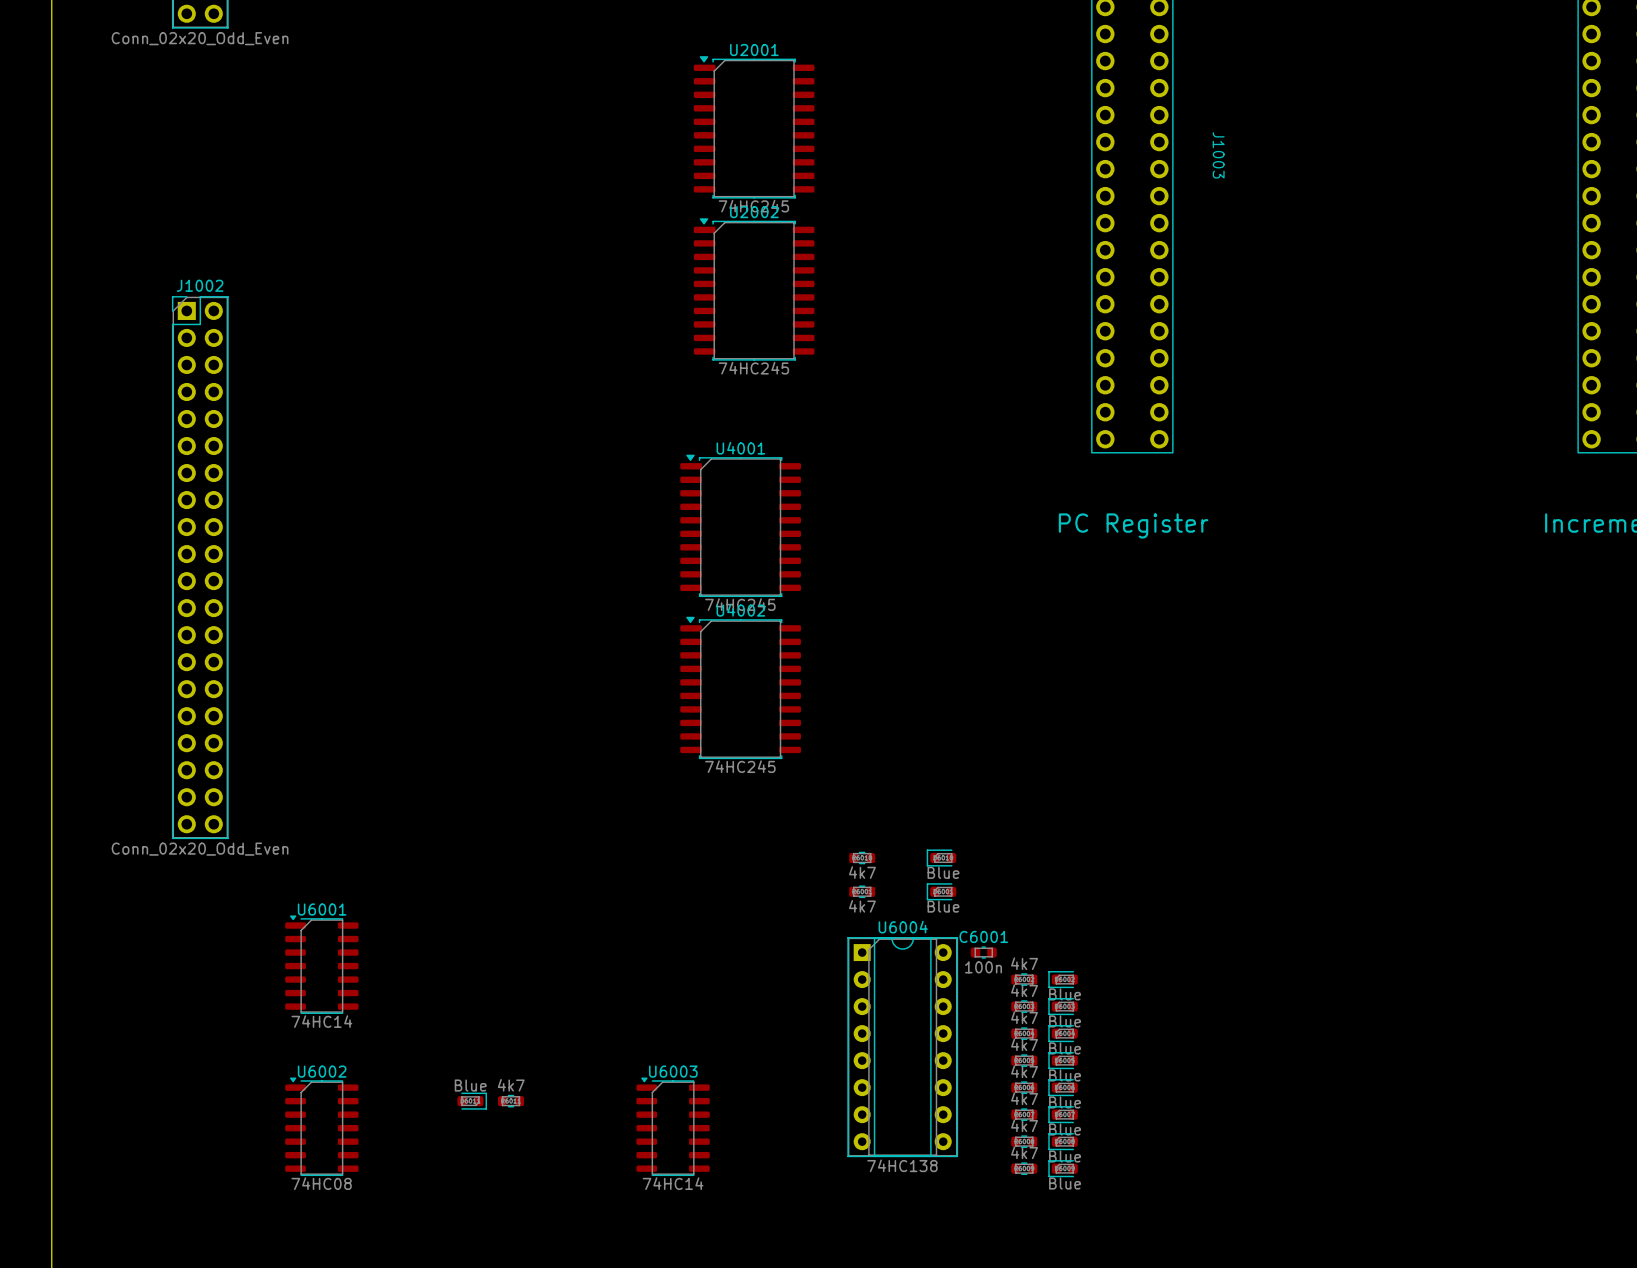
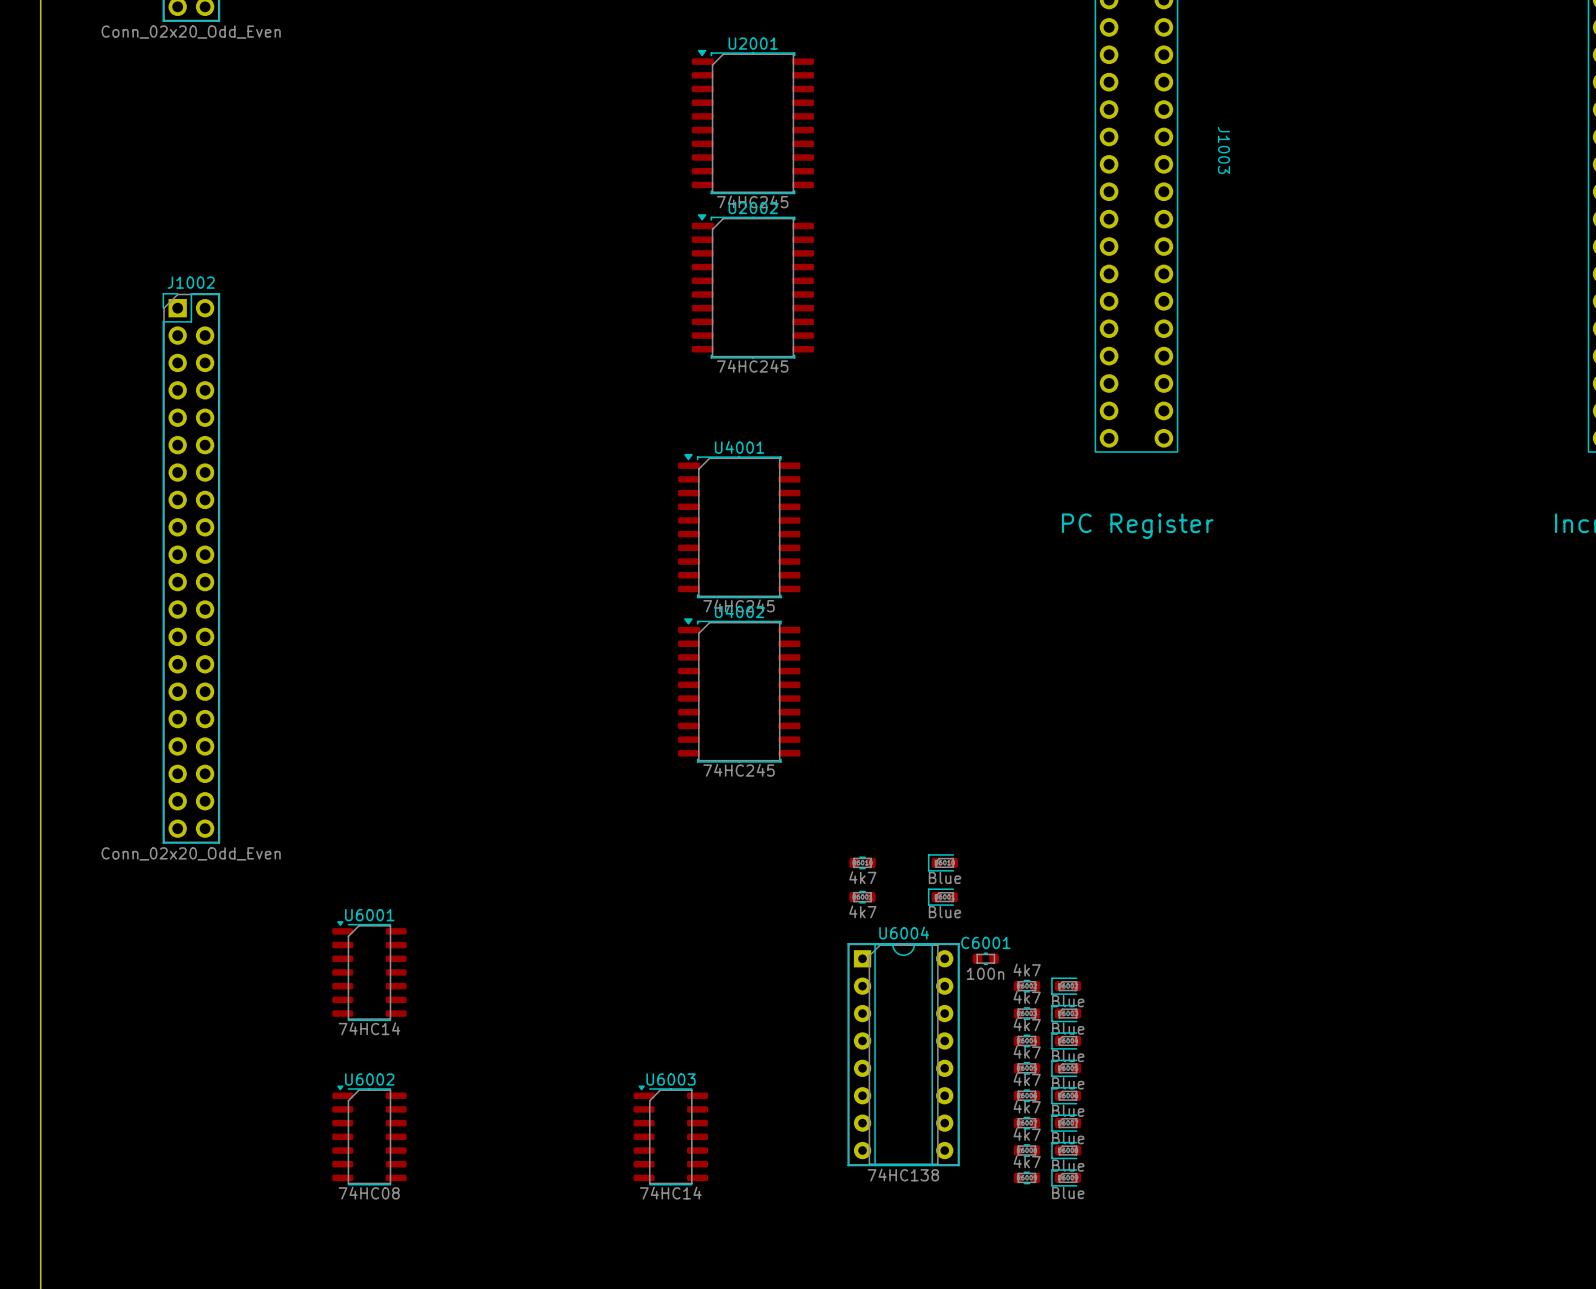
U6001 position: (321, 964) -> (369, 971)
part: Blue (472, 1101) -> none
part: 4k7 (510, 1101) -> none
U6002 position: (321, 1126) -> (369, 1135)

